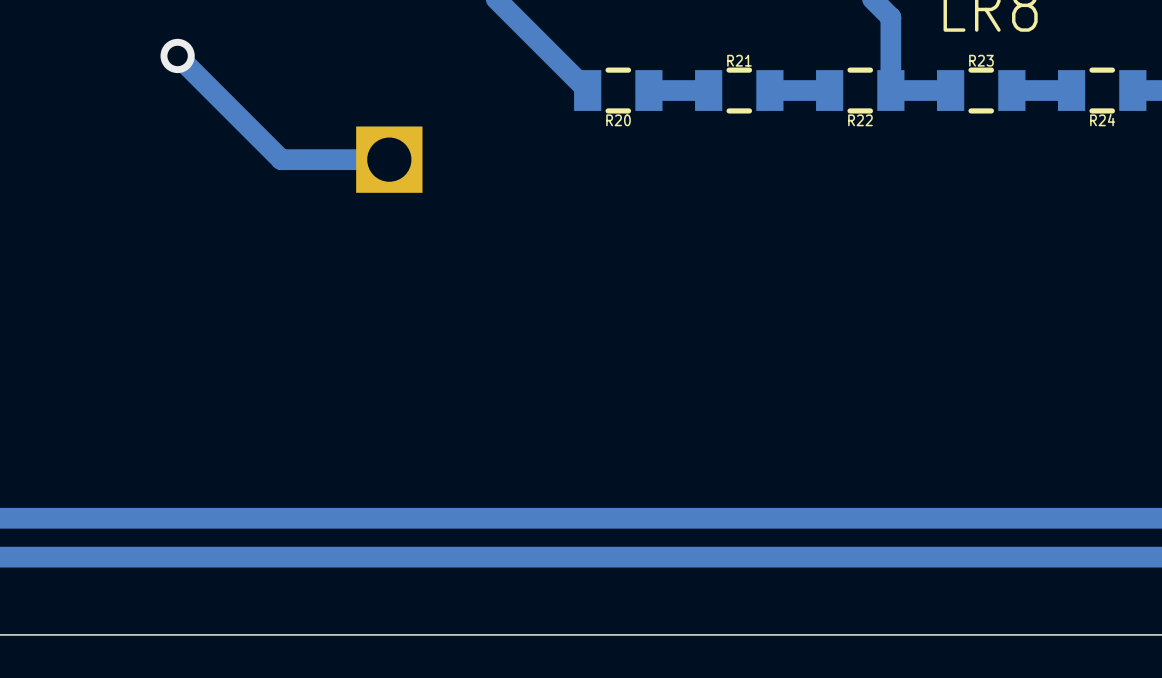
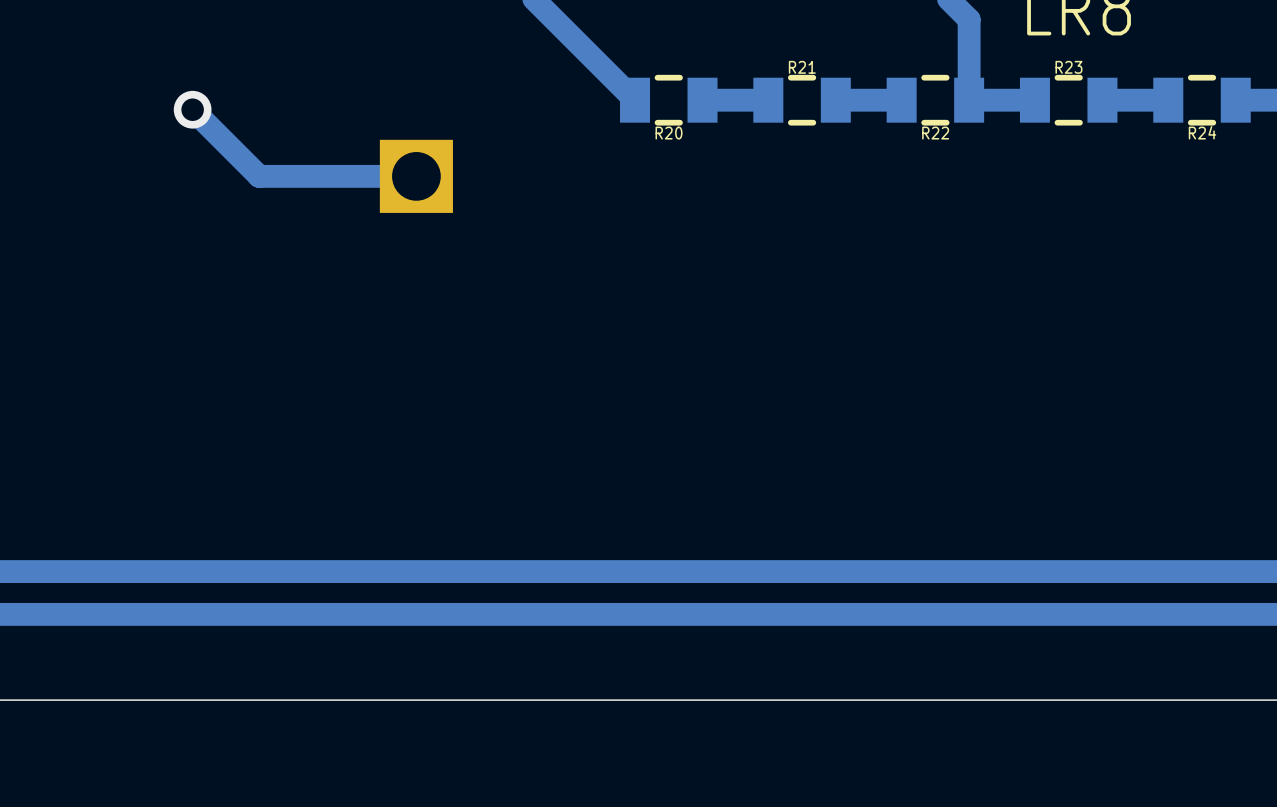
track: (177, 55) (281, 159) -> (192, 109) (259, 176) (297, 176)
via position: (177, 55) -> (192, 109)

